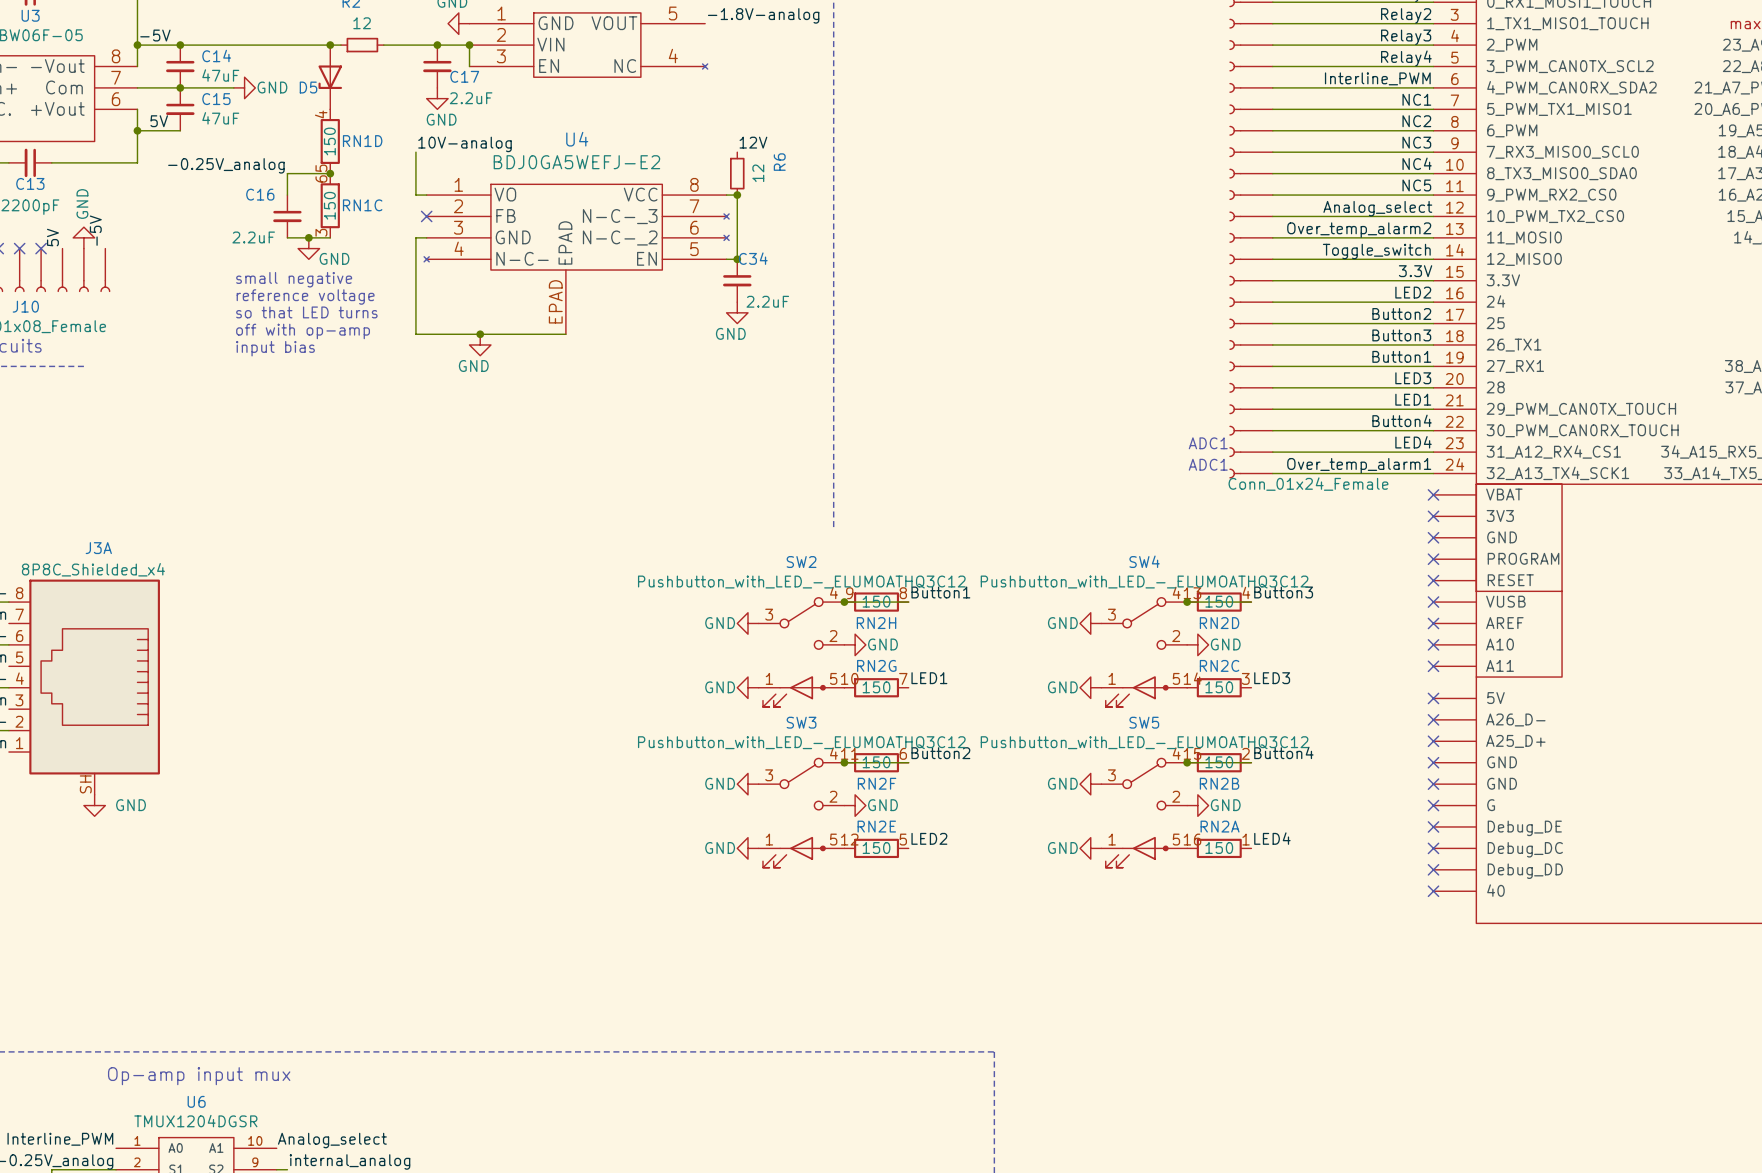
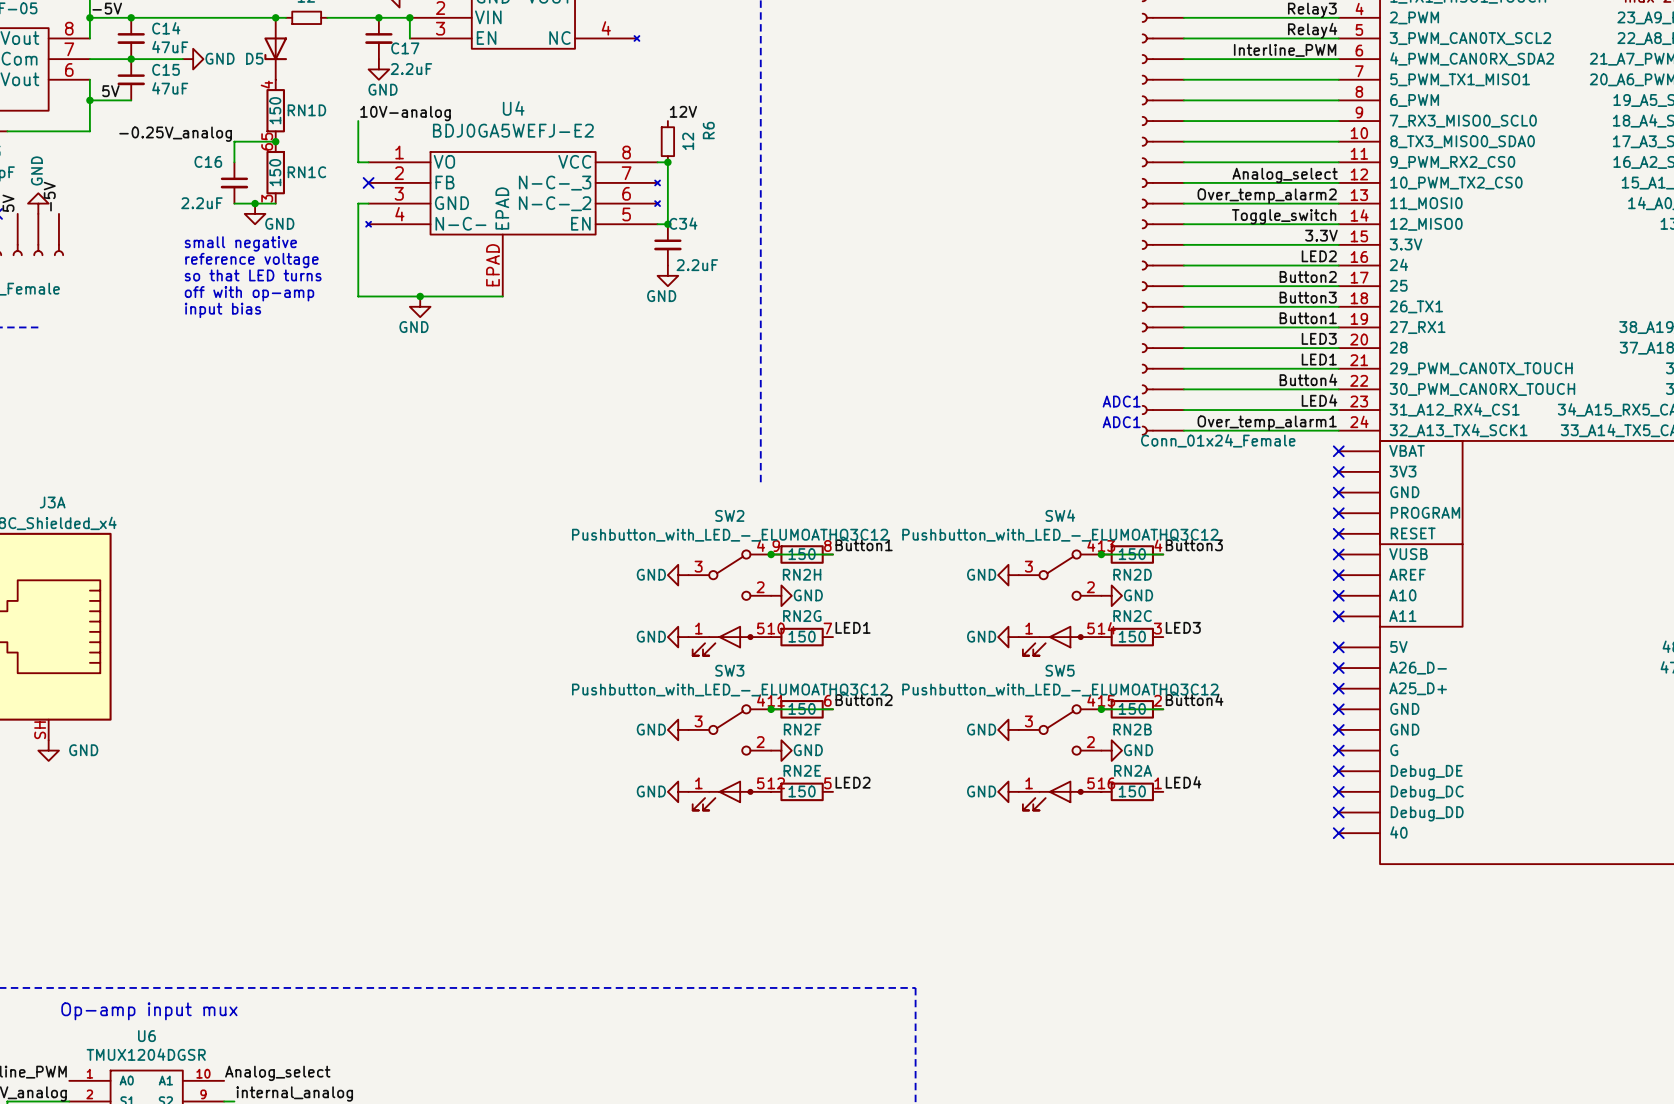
label: NC1 (1416, 99) -> none
label: NC2 (1416, 121) -> none
label: NC3 (1416, 142) -> none
label: NC4 (1417, 163) -> none
label: NC5 (1416, 185) -> none

